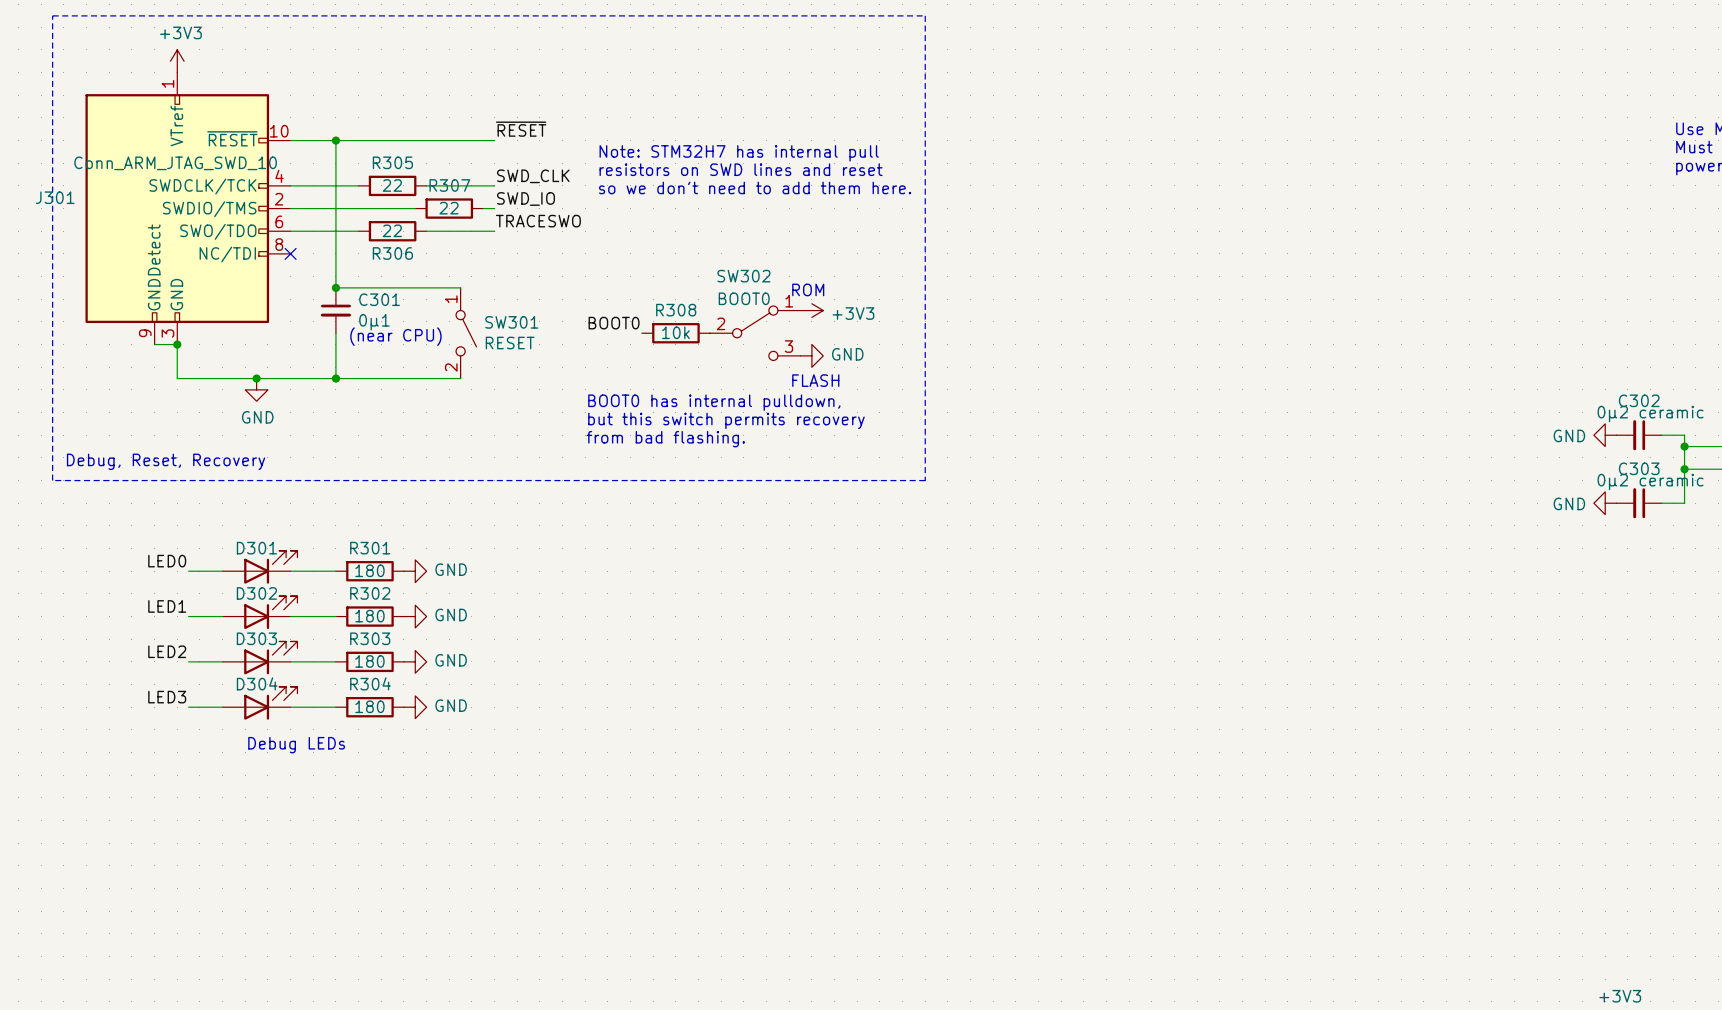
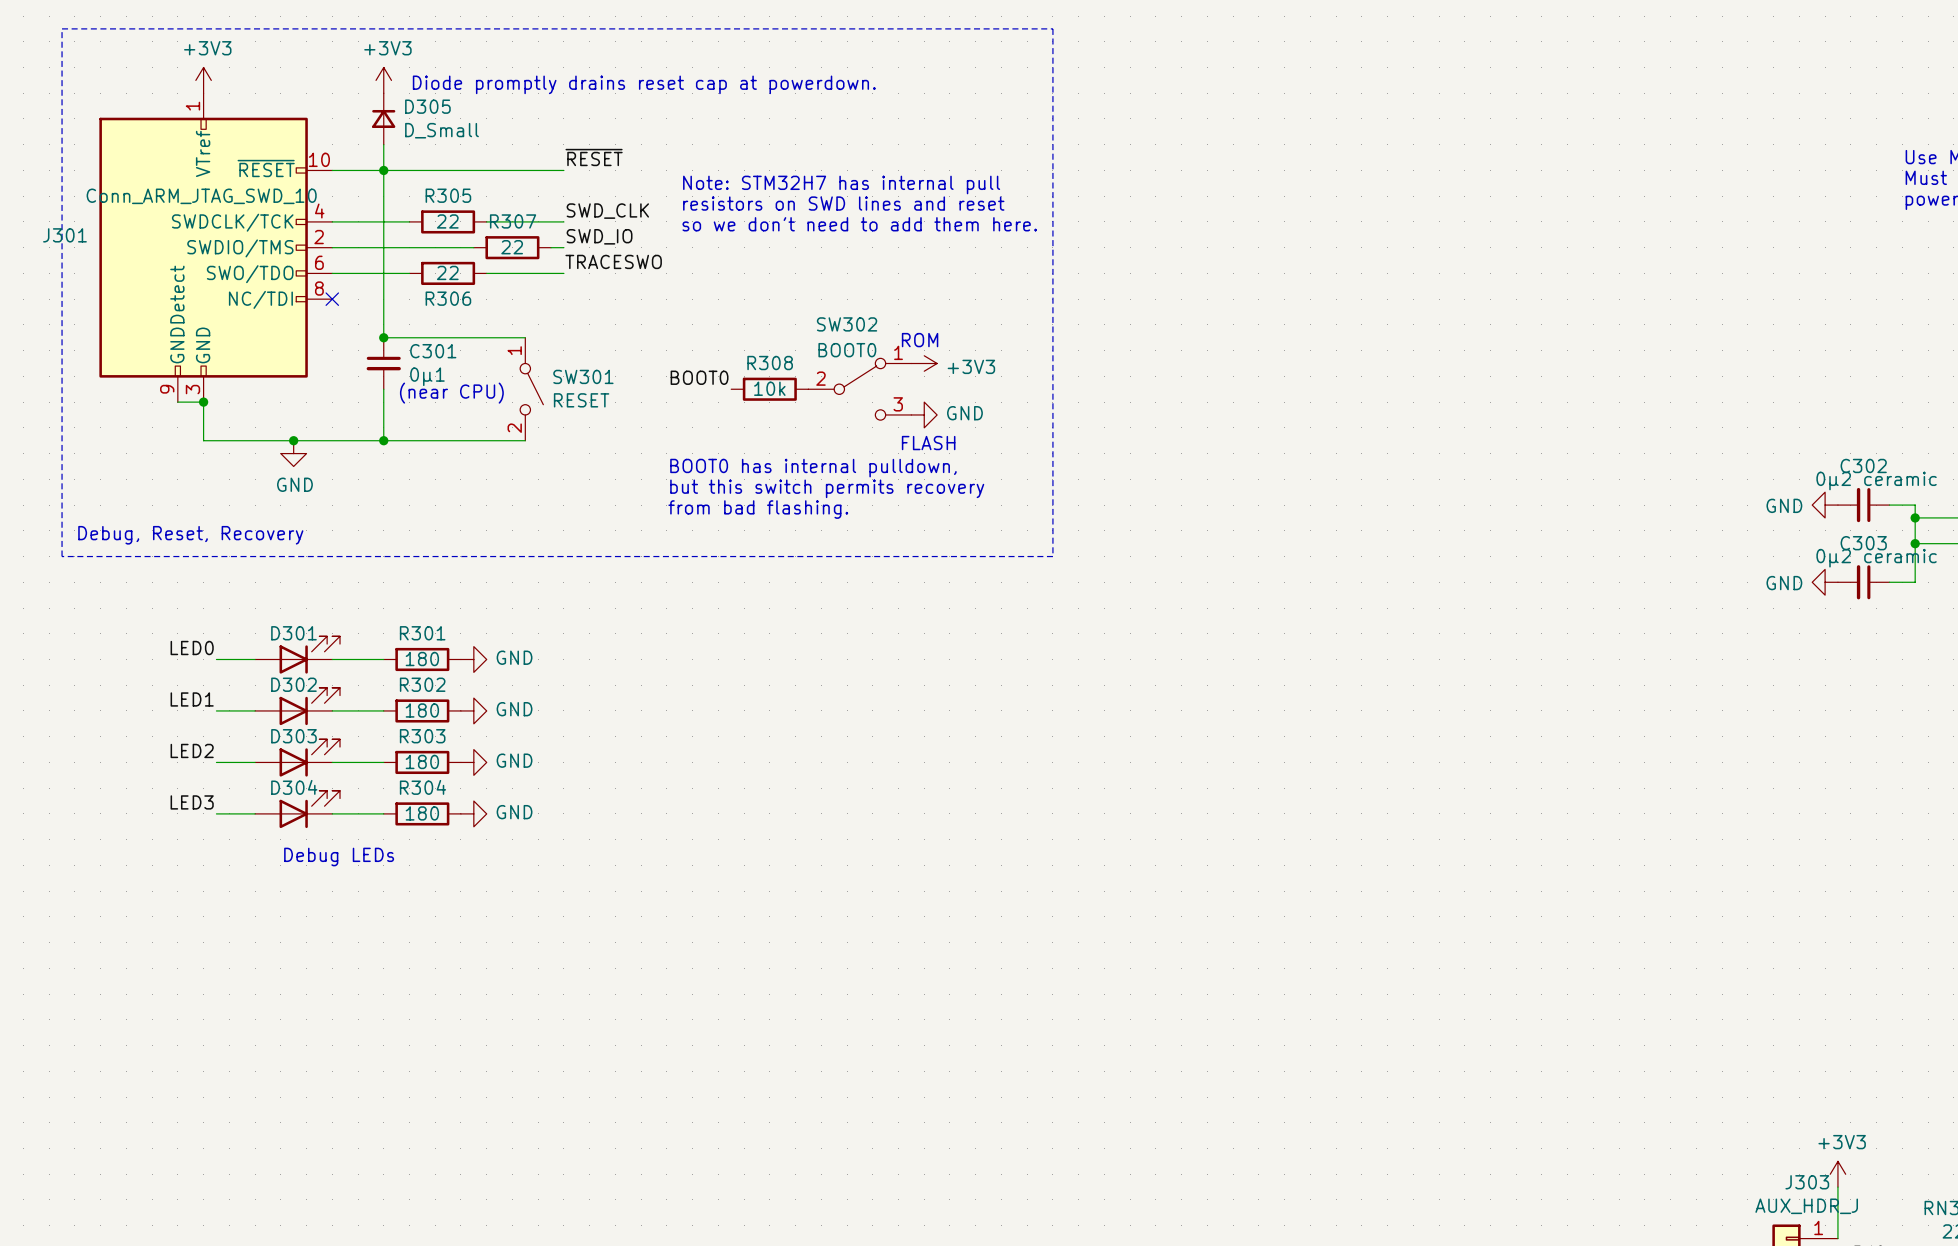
power symbol: none -> +3V3 (383, 80)
text: none -> Diode promptly drains reset cap at powerdown. (644, 84)
D305: none -> D_Small (383, 118)
wire: none -> (383, 144) (383, 170)

